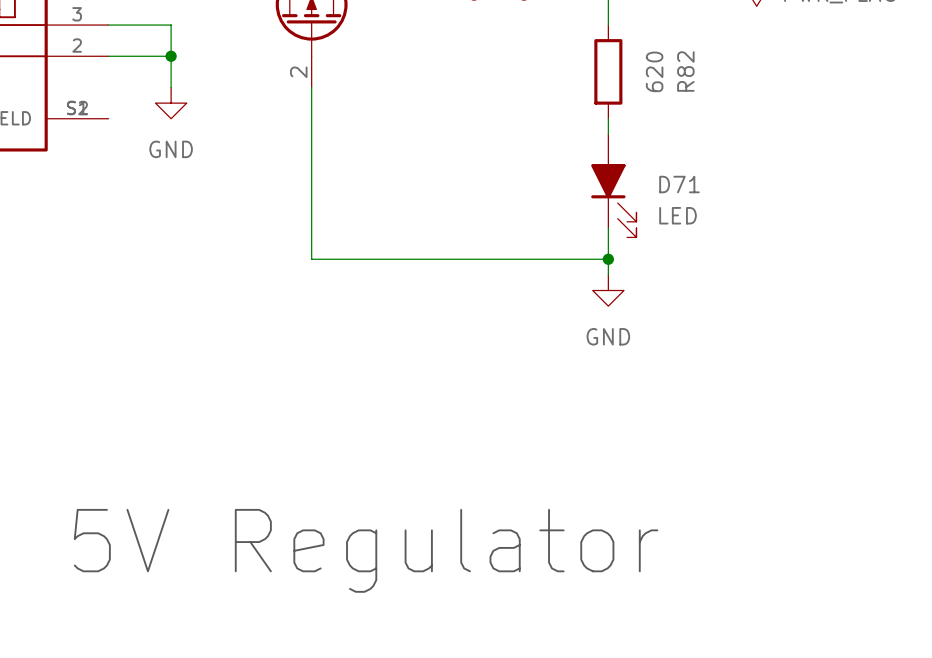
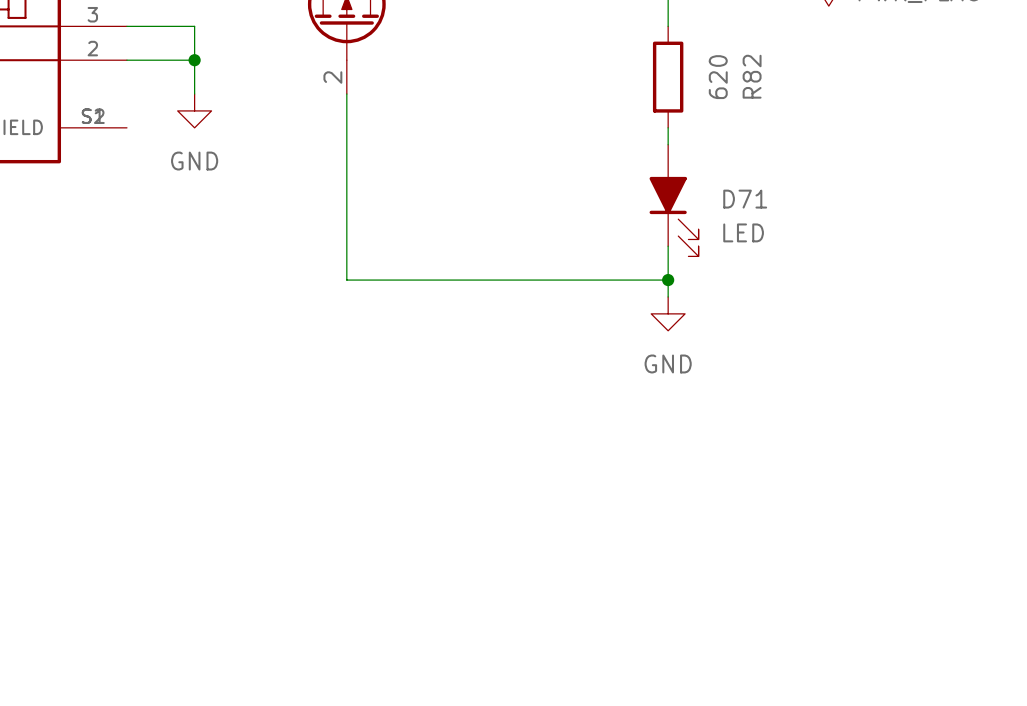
text: 5V Regulator (366, 550) -> none

